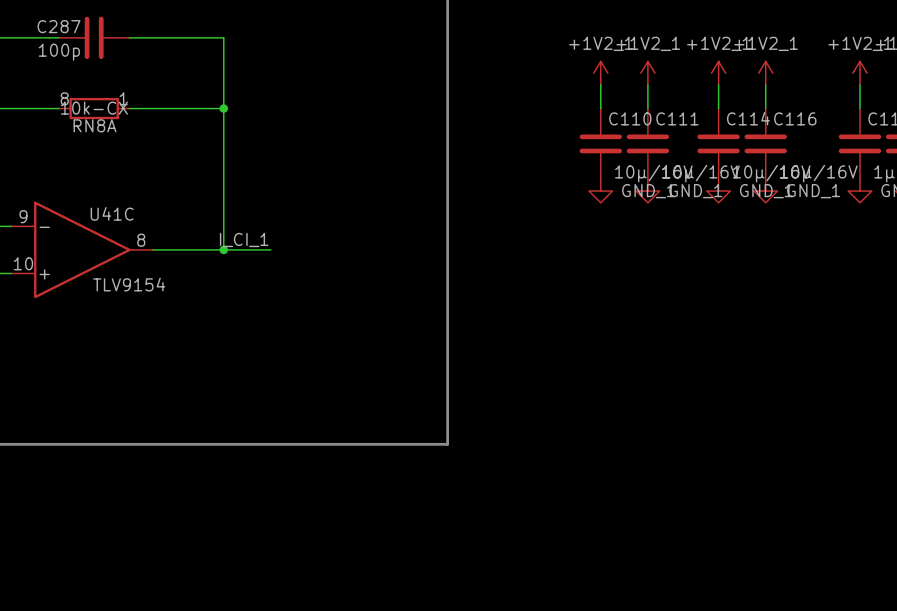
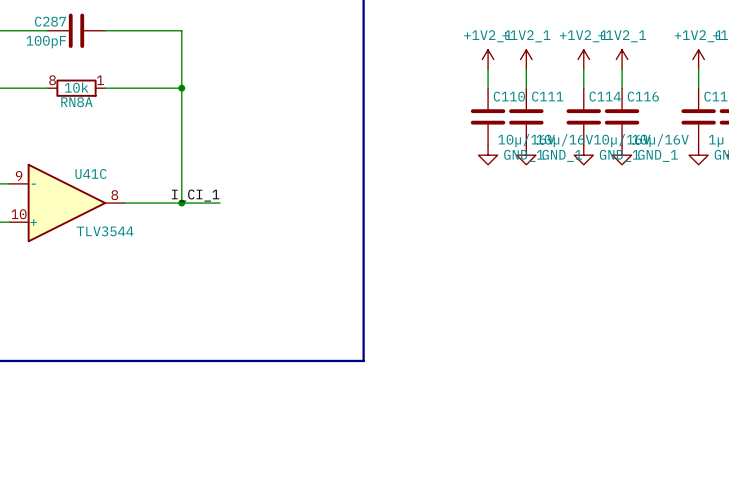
C287 value: 100p (59, 52) -> 100pF (46, 42)
RN8A value: 10k-CX (94, 108) -> 10k (76, 87)
U41C value: TLV9154 (129, 284) -> TLV3544 (105, 231)

